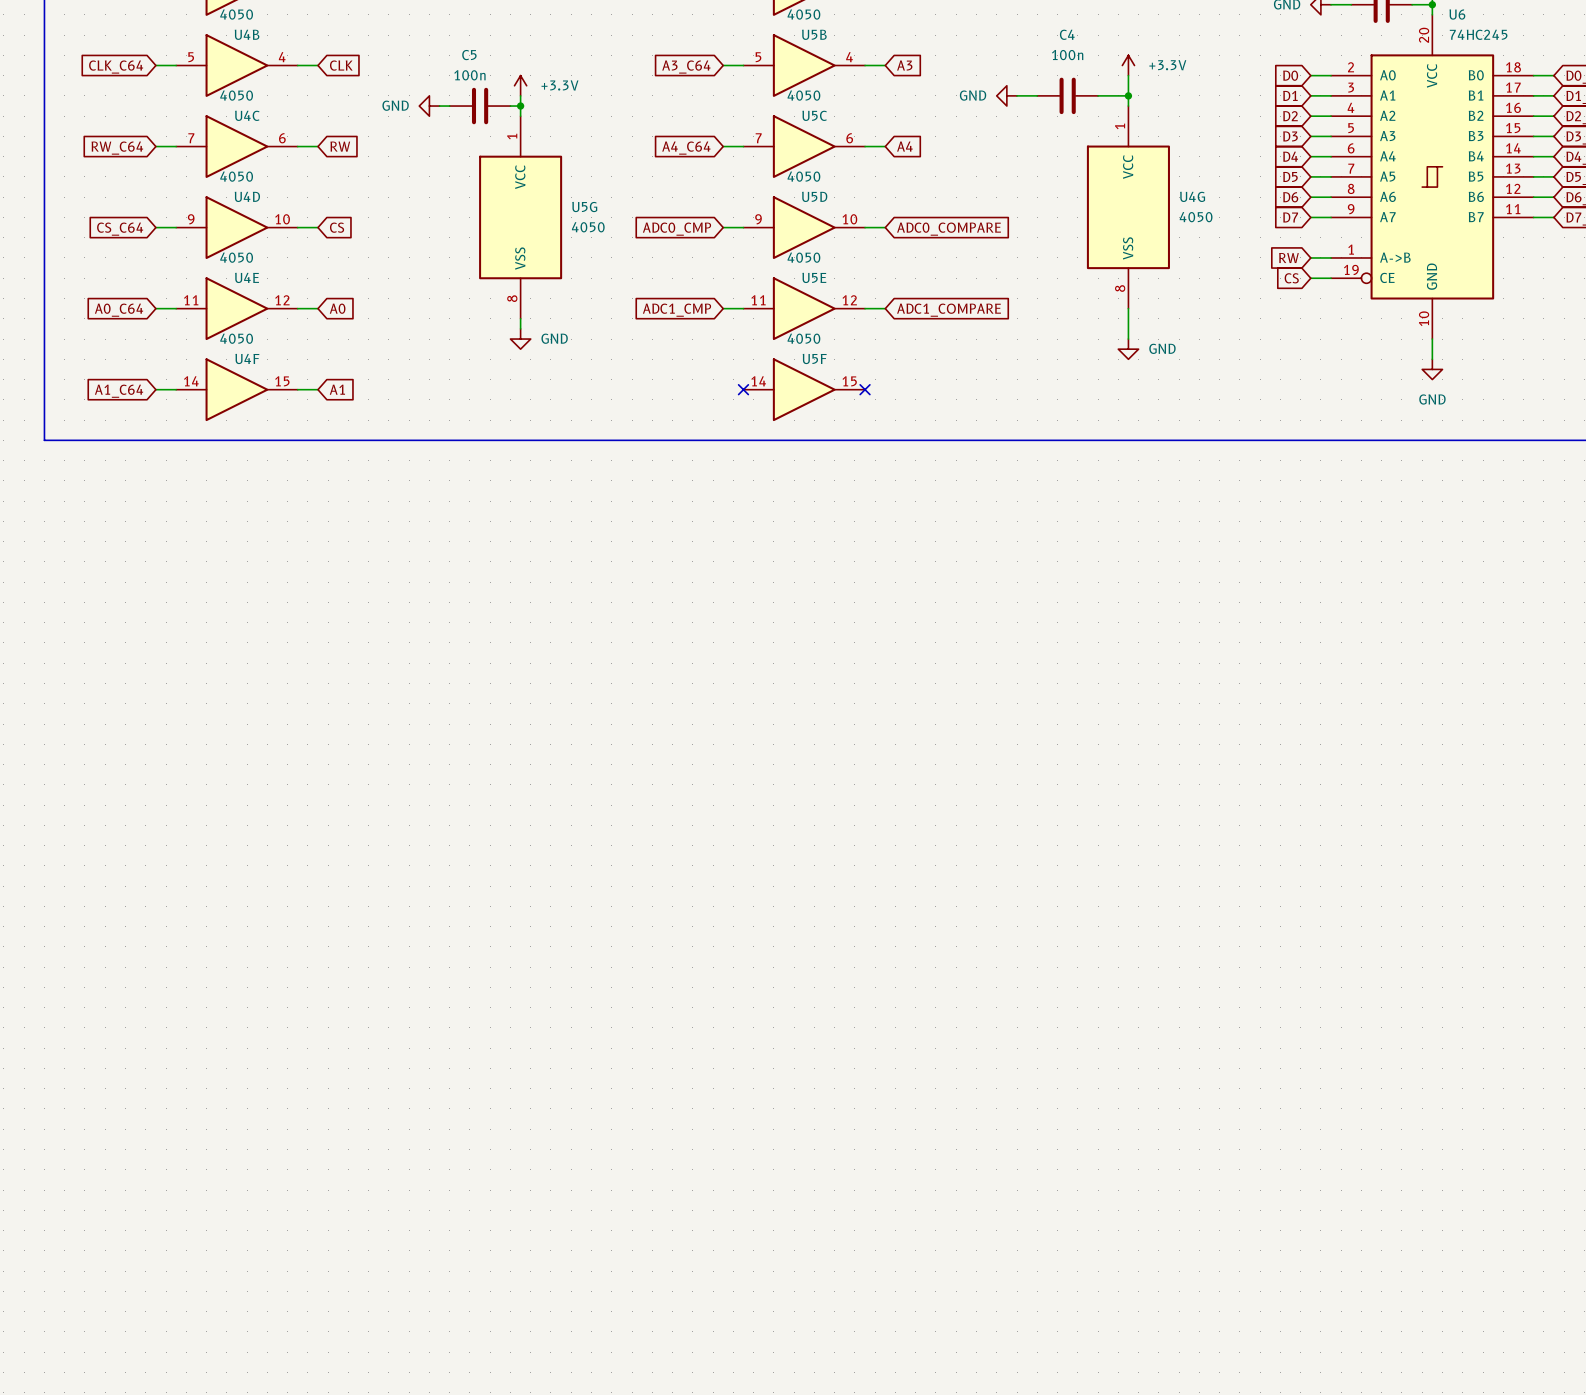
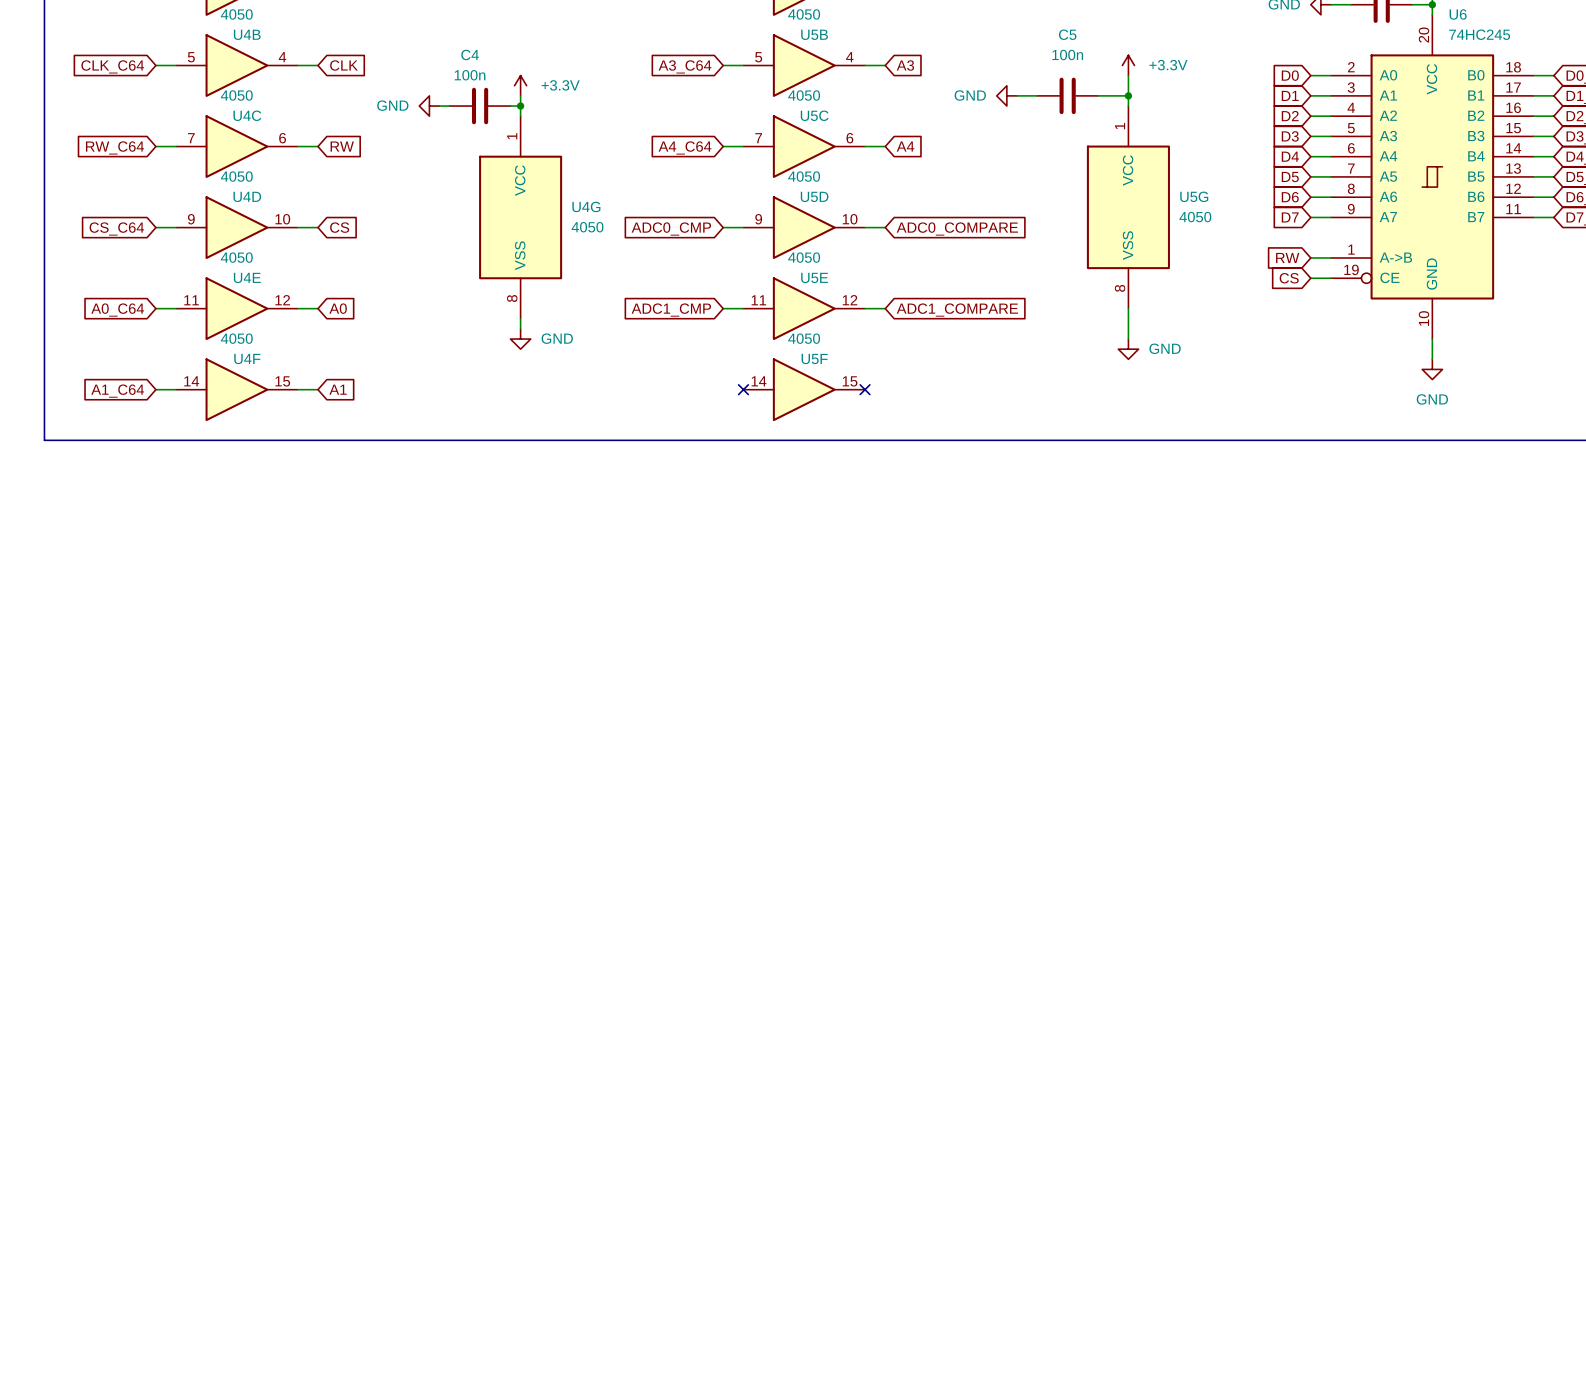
C4 name: C4 (1067, 34) -> C5 (1067, 34)
C5 name: C5 (469, 55) -> C4 (470, 54)
U4G name: U4G (1192, 196) -> U5G (1194, 196)
U5G name: U5G (584, 207) -> U4G (586, 206)

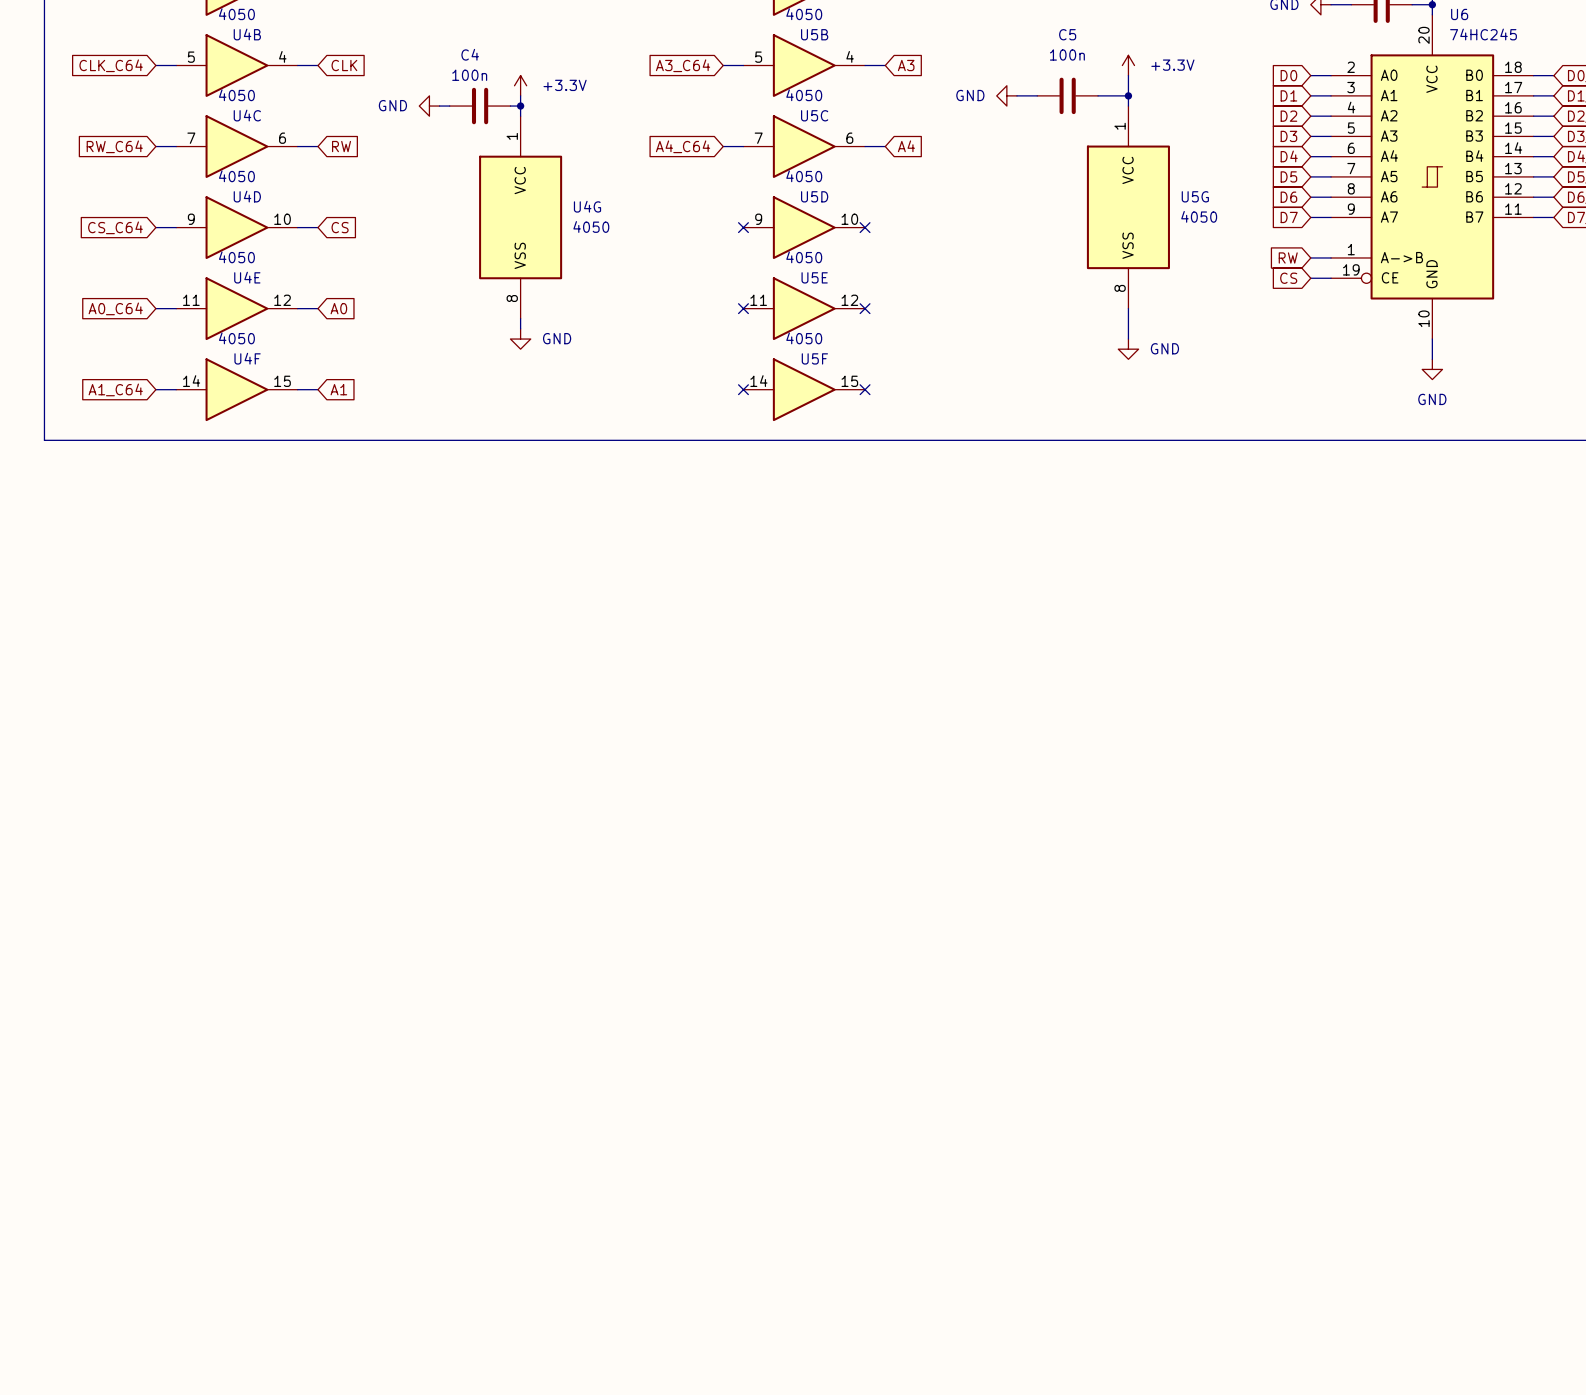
wire: (723, 227) (743, 227) -> none
no-connect mark: none -> (743, 227)
wire: (865, 227) (885, 227) -> none
no-connect mark: none -> (865, 227)
global label: ADC0_CMP (671, 228) -> none
global label: ADC0_COMPARE (957, 228) -> none
wire: (723, 308) (743, 308) -> none
no-connect mark: none -> (743, 308)
wire: (865, 308) (885, 308) -> none
no-connect mark: none -> (865, 308)
global label: ADC1_CMP (671, 310) -> none
global label: ADC1_COMPARE (957, 310) -> none

